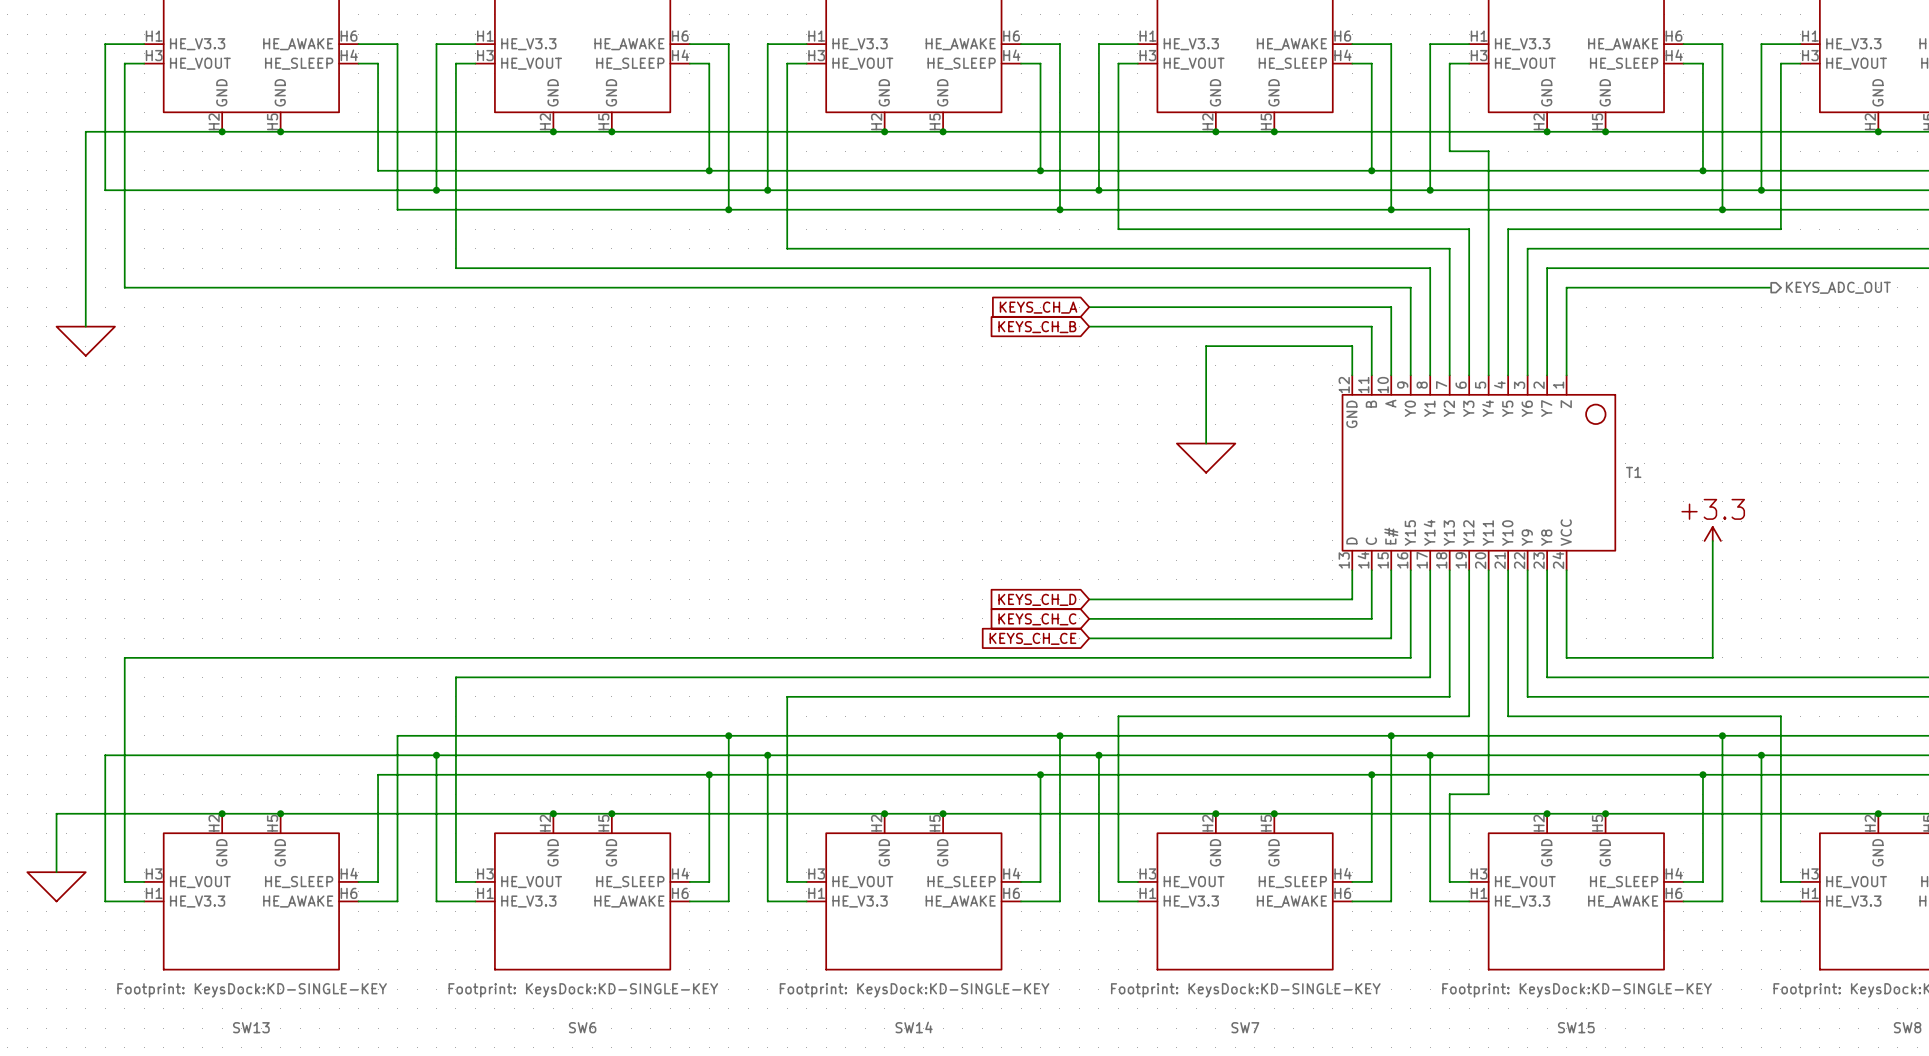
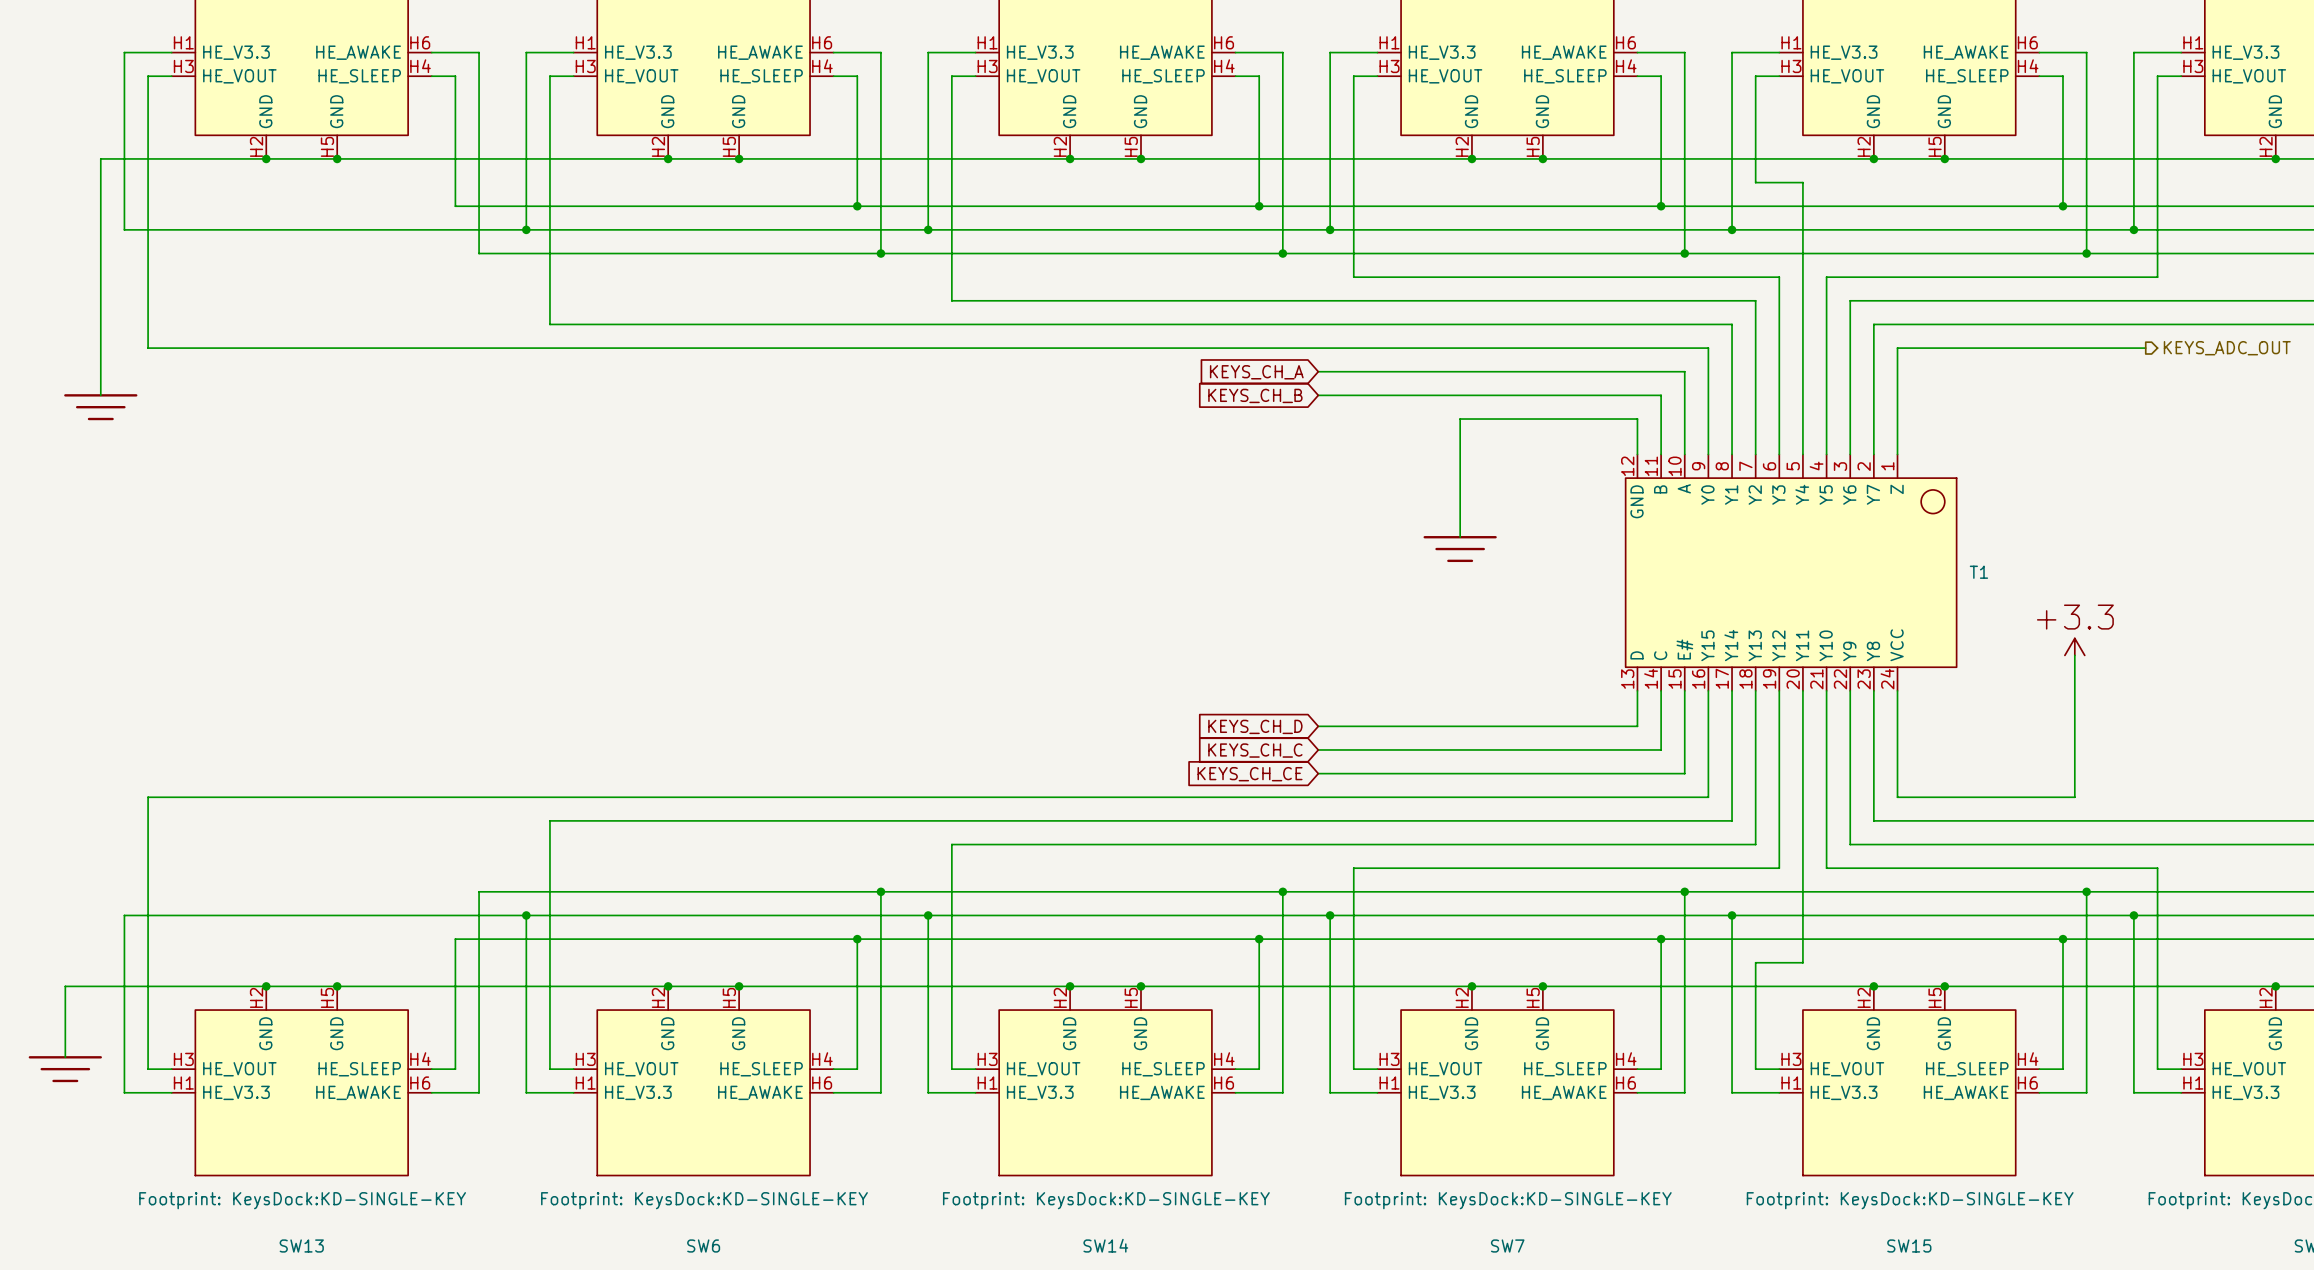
power symbol shape: [56, 326, 115, 356] -> [64, 394, 138, 421]
power symbol shape: [1176, 443, 1236, 473] -> [1423, 536, 1497, 563]
power symbol shape: [27, 872, 86, 902] -> [28, 1056, 102, 1083]

